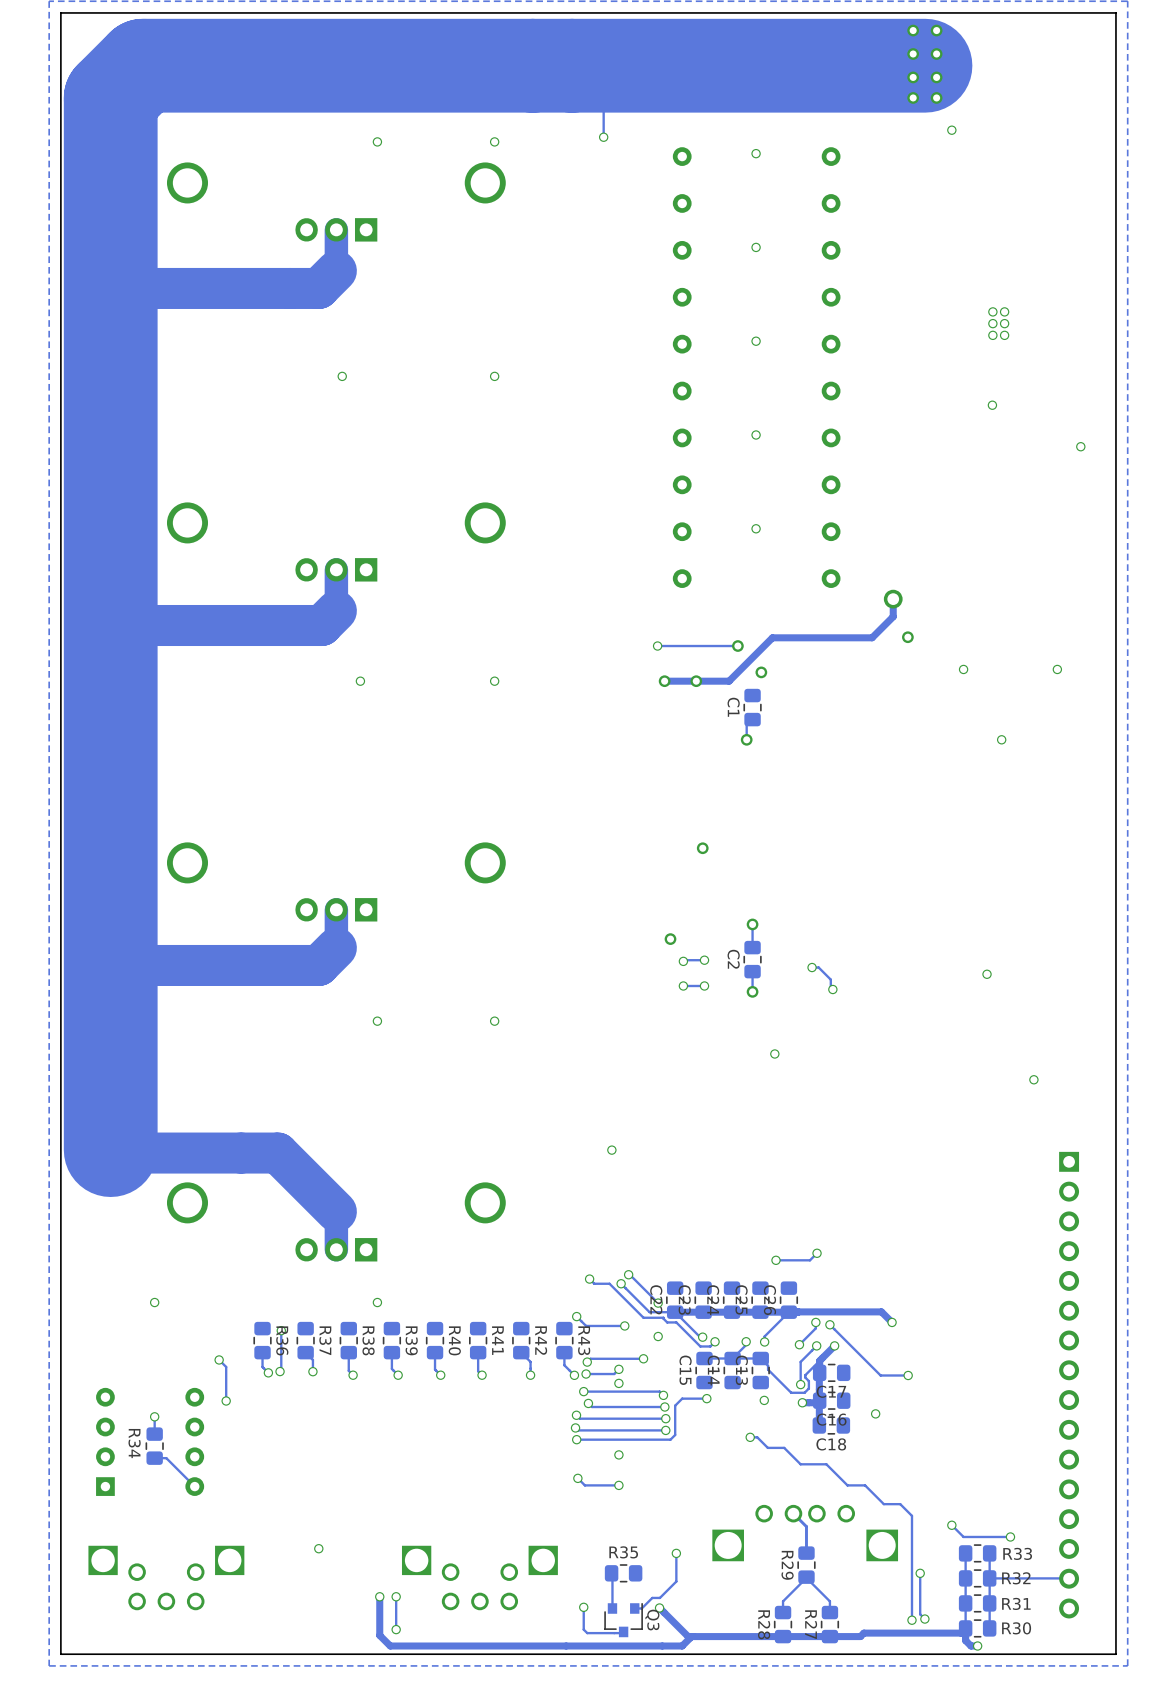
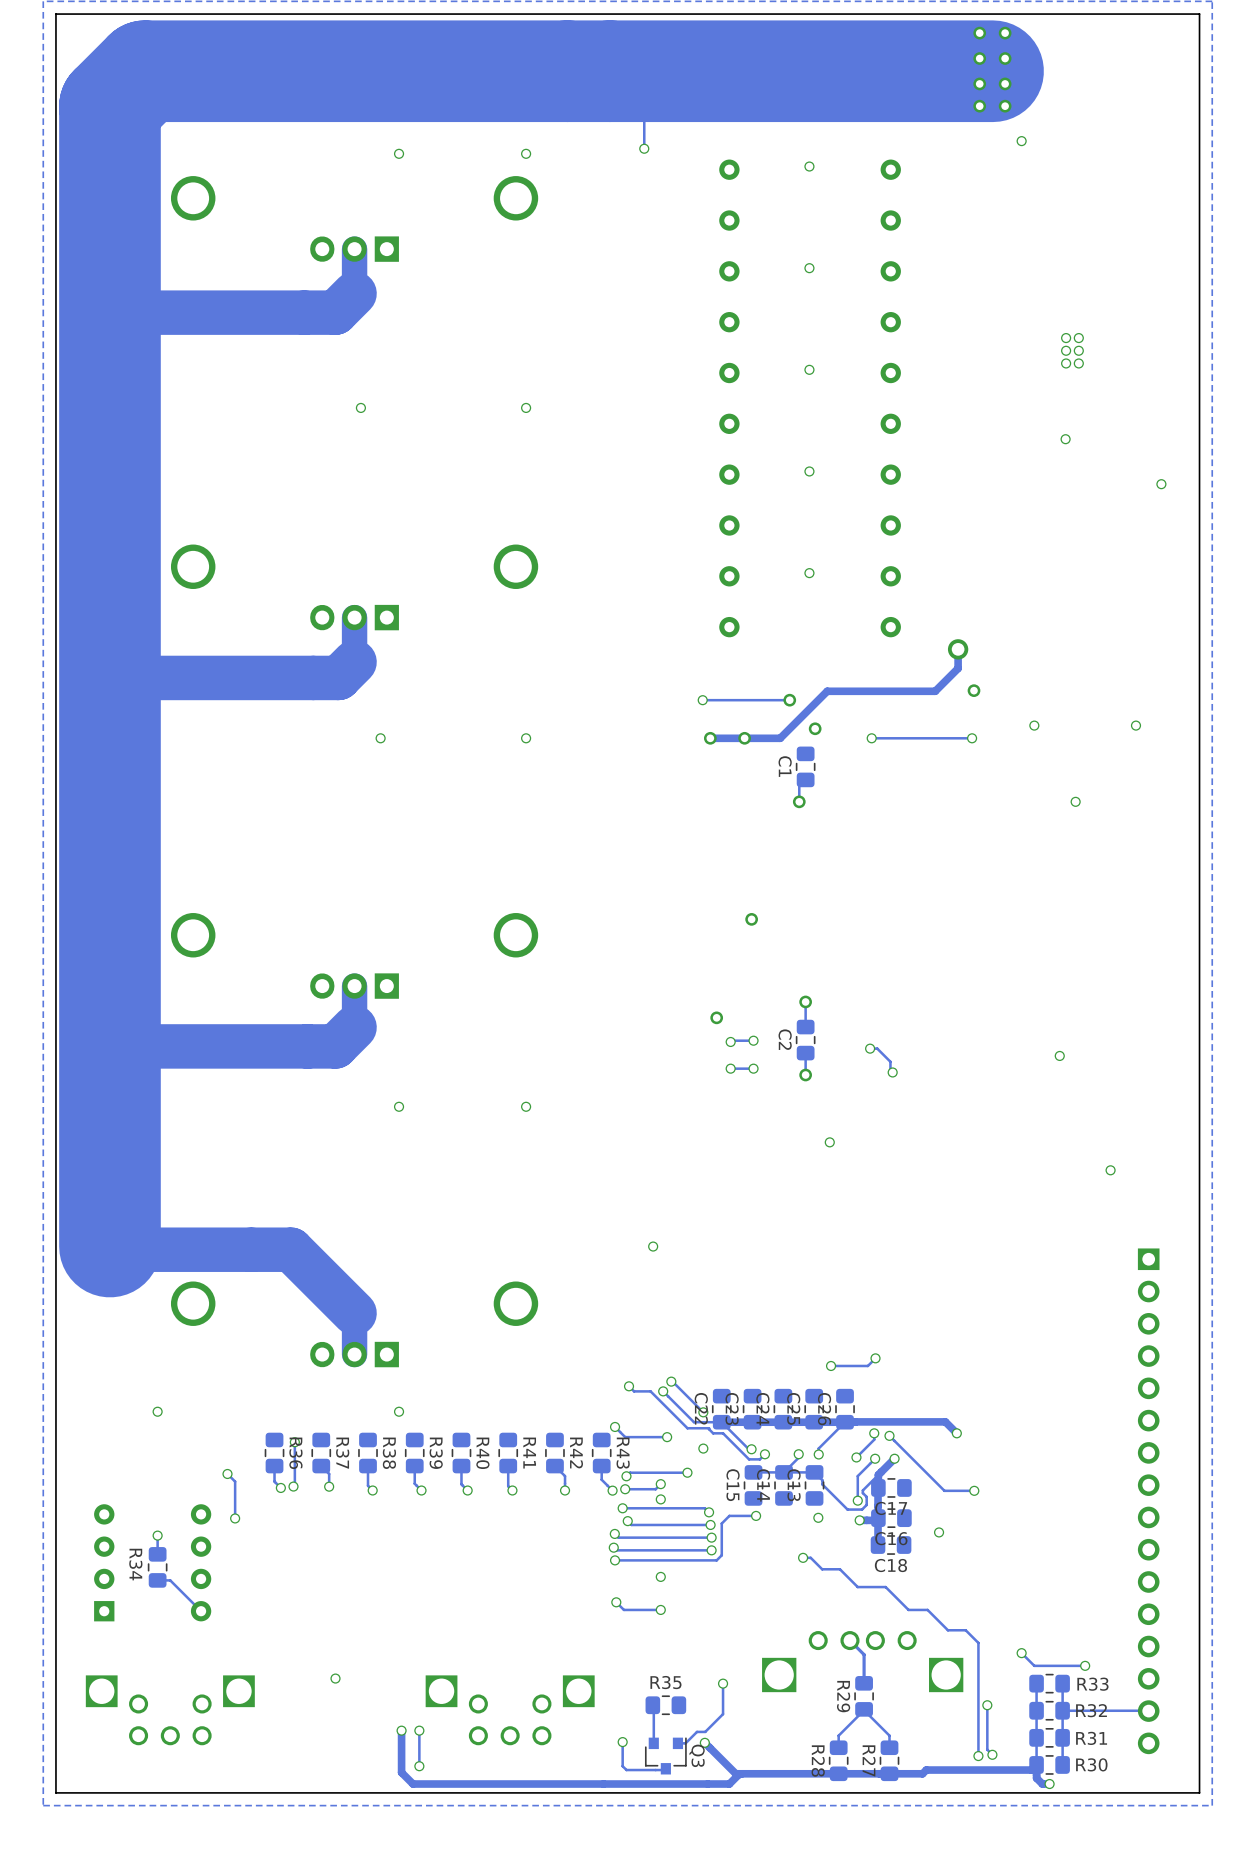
via: none -> (871, 738)
track: none -> (972, 738) (871, 738)
via: none -> (972, 738)

